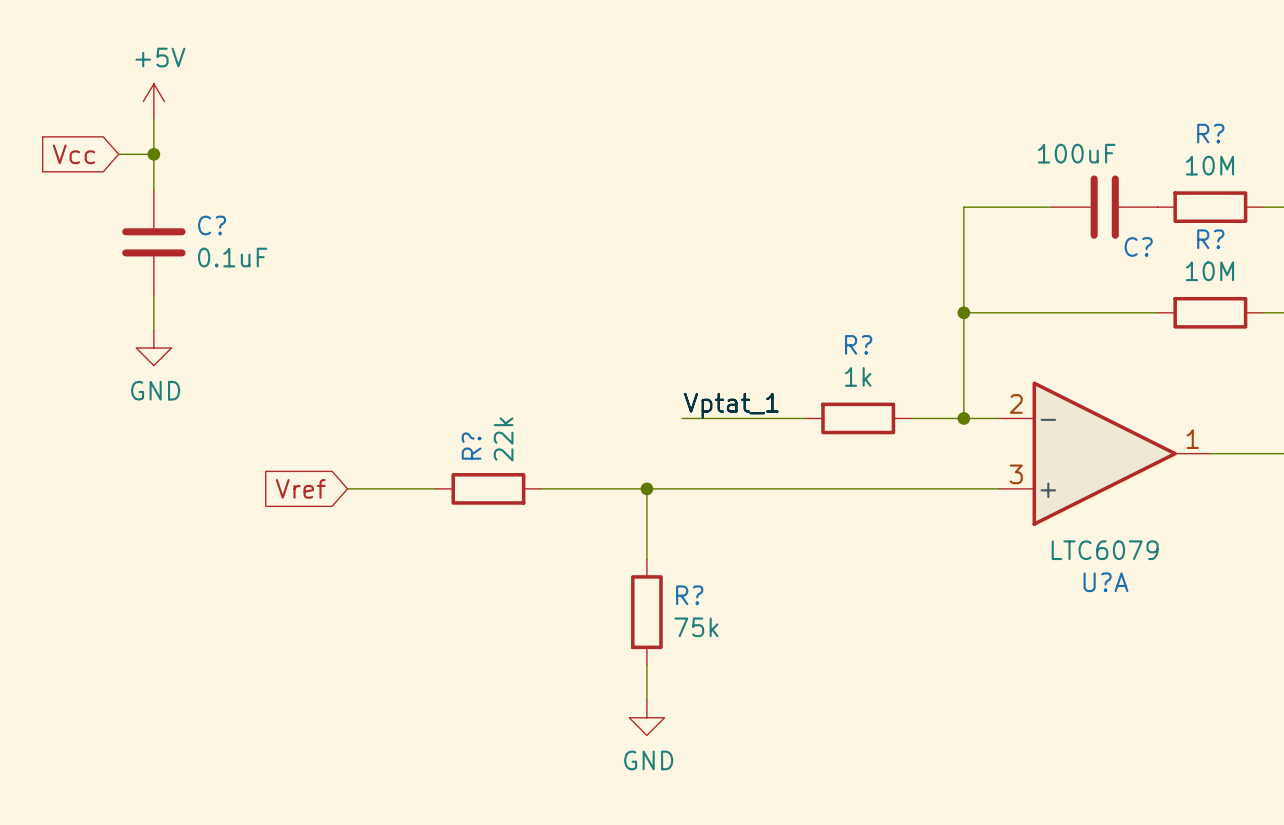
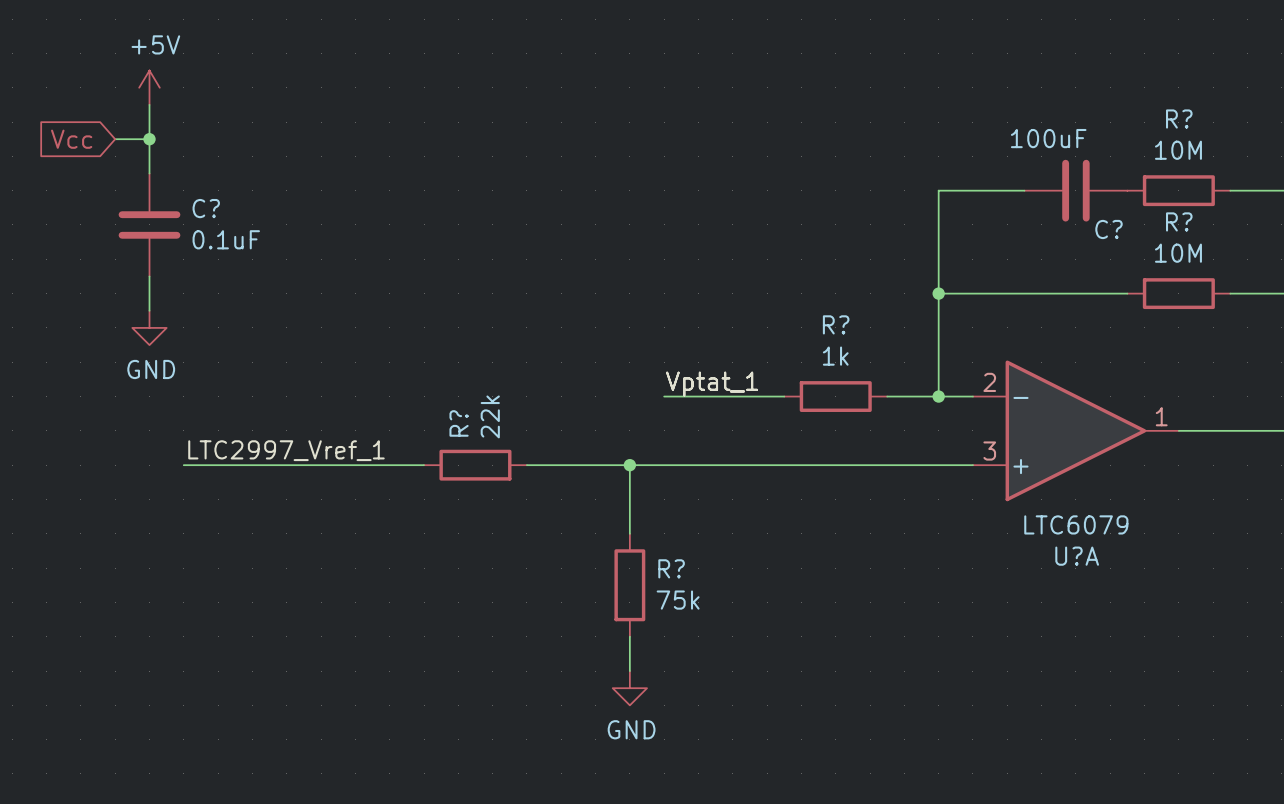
label: none -> LTC2997_Vref_1 (286, 450)
wire: none -> (183, 465) (338, 465)
global label: Vref (300, 488) -> none

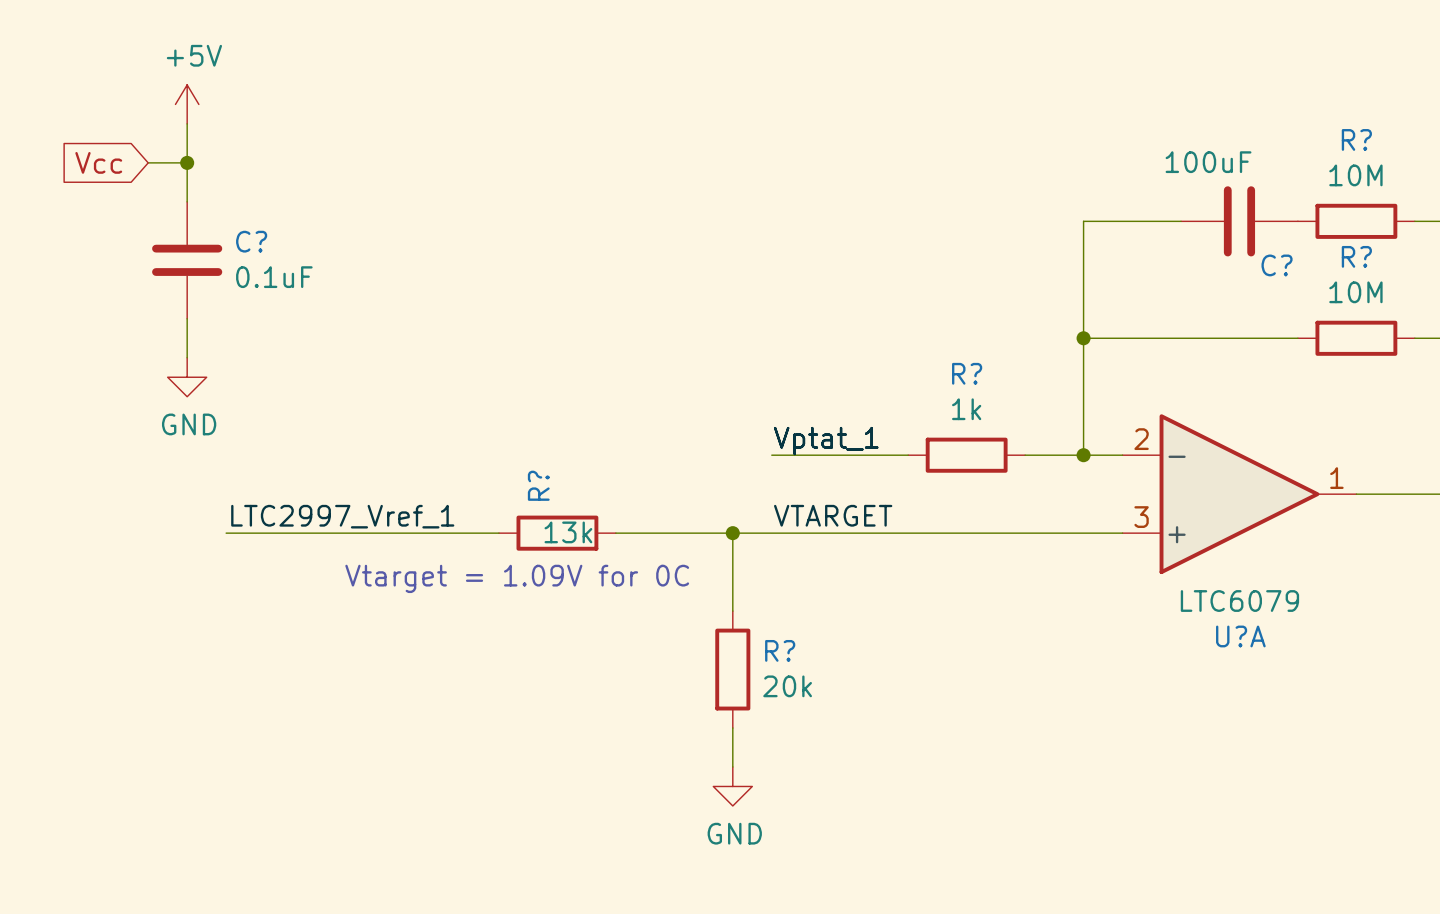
R? value: 22k (490, 416) -> 13k (568, 532)
label: none -> VTARGET (833, 515)
text: none -> Vtarget = 1.09V for 0C (517, 578)
R? value: 75k (678, 600) -> 20k (787, 686)

